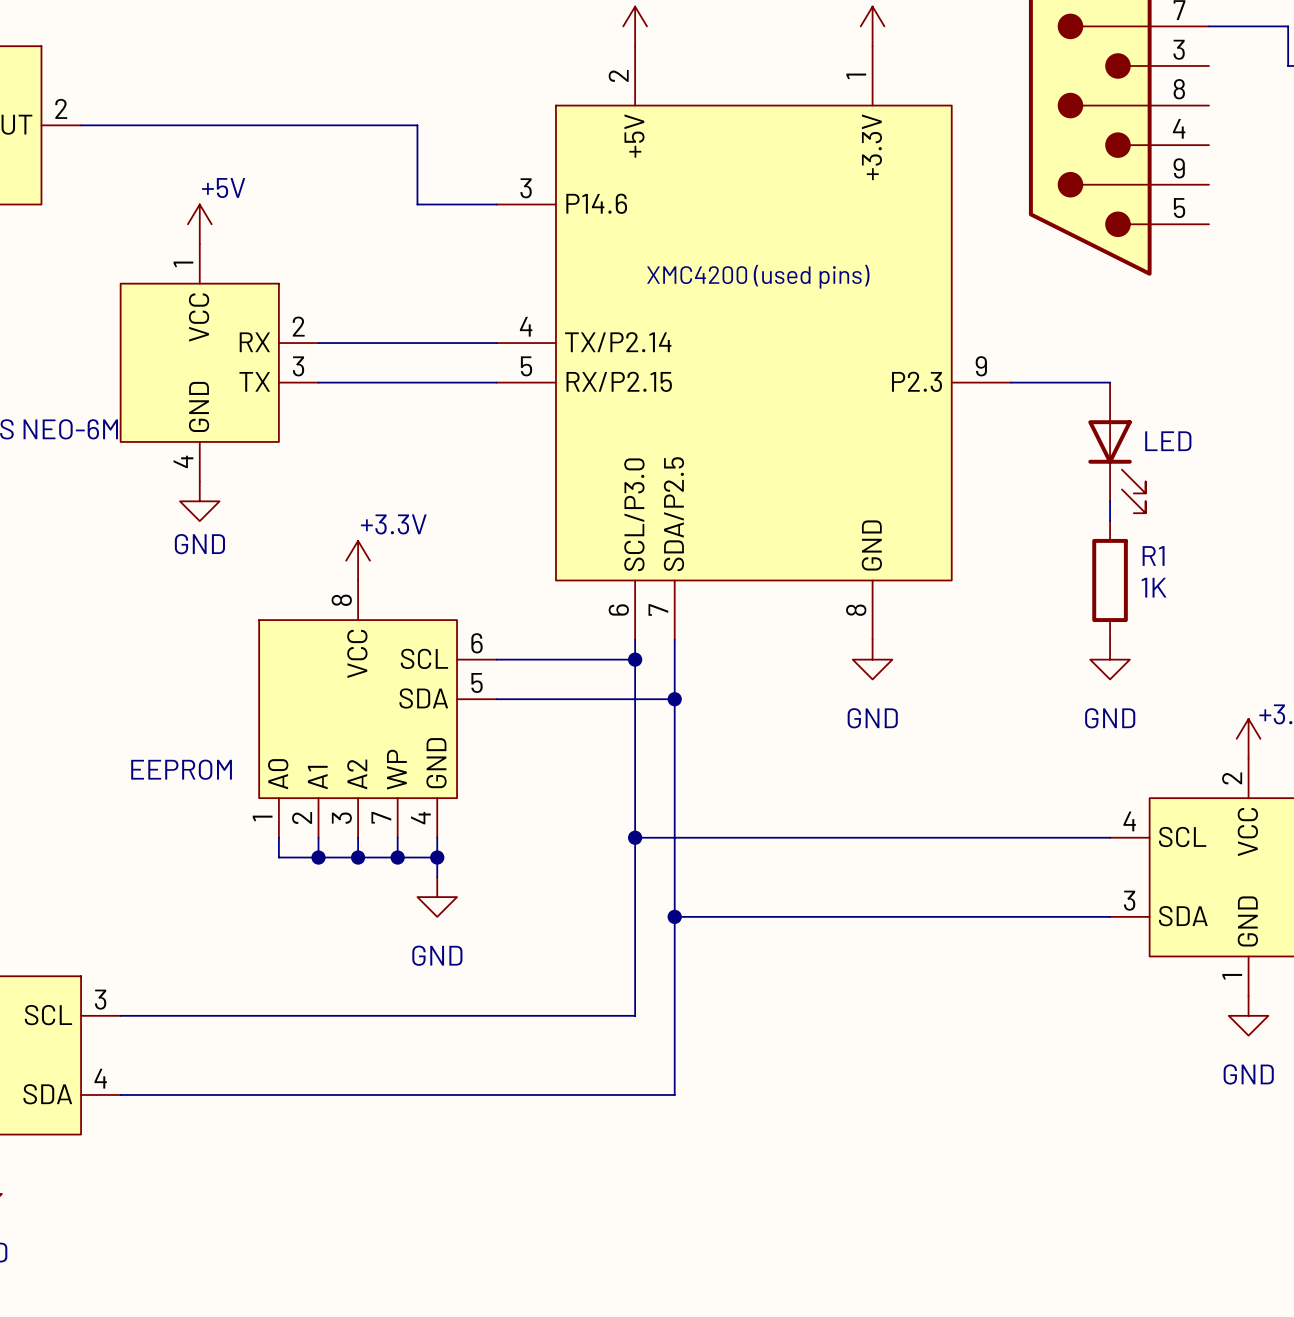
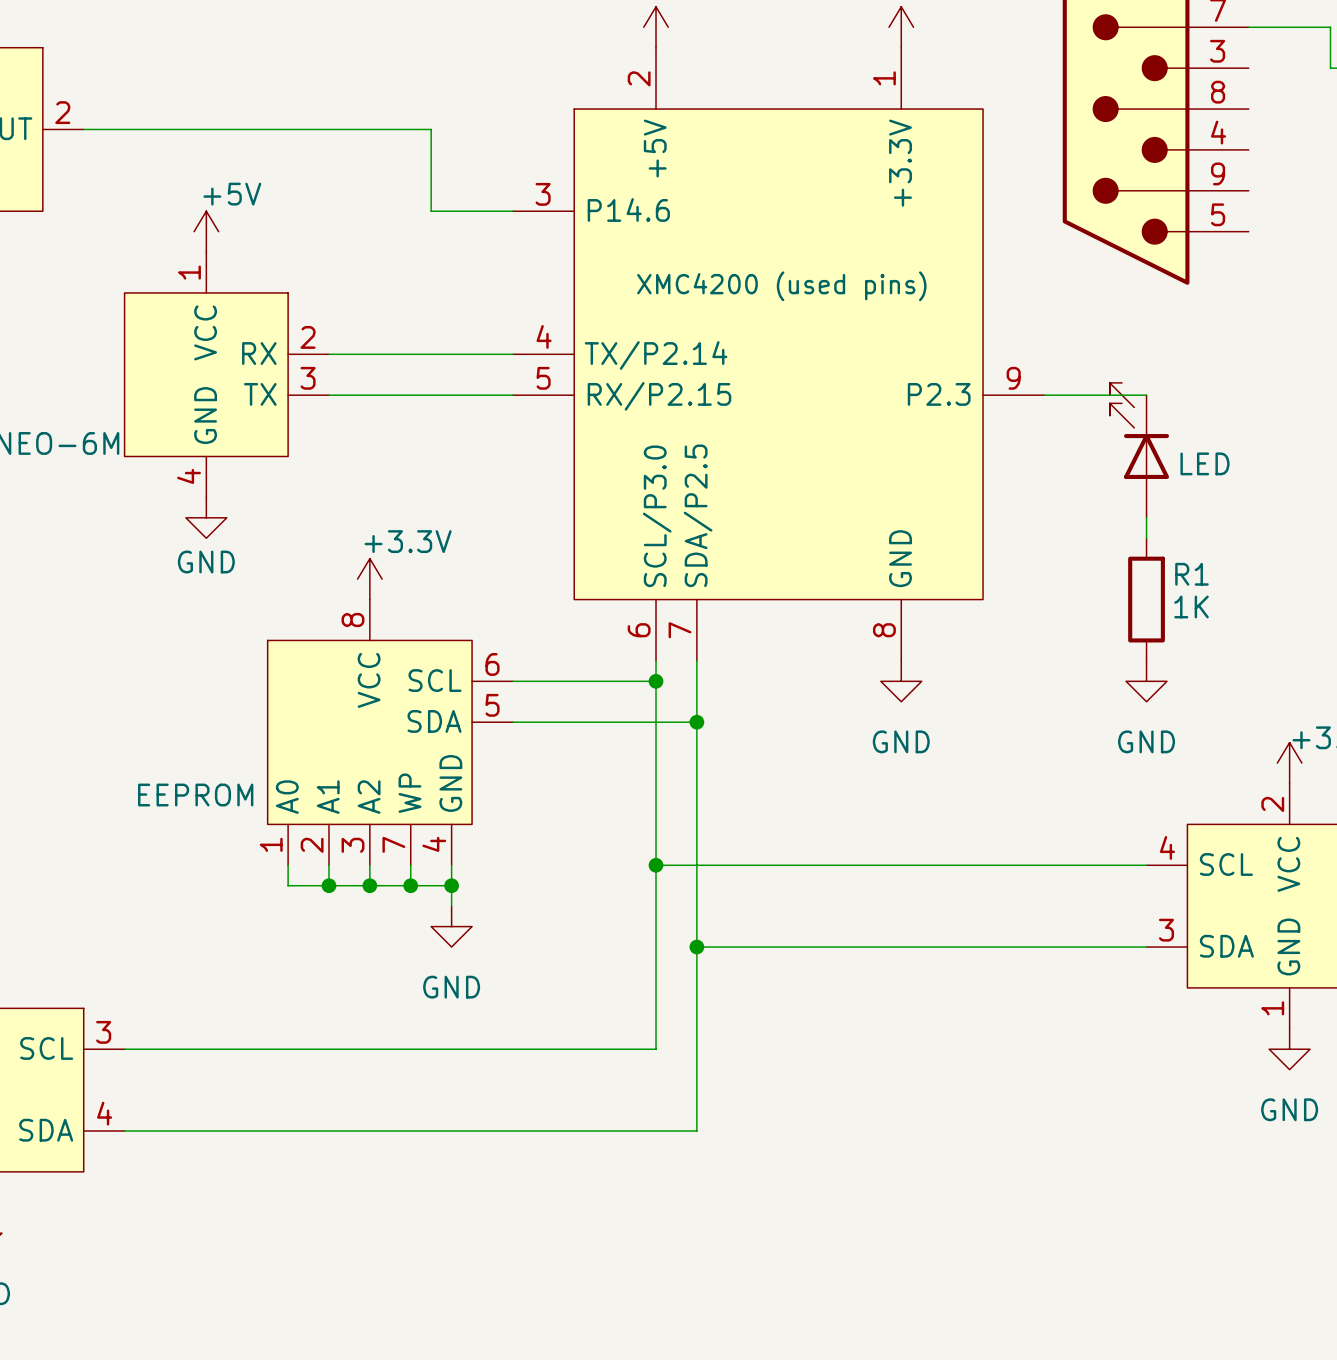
part value position: LED (1168, 441) -> LED (1204, 463)
part rotation: 0° (1116, 466) -> 180° (1139, 430)

